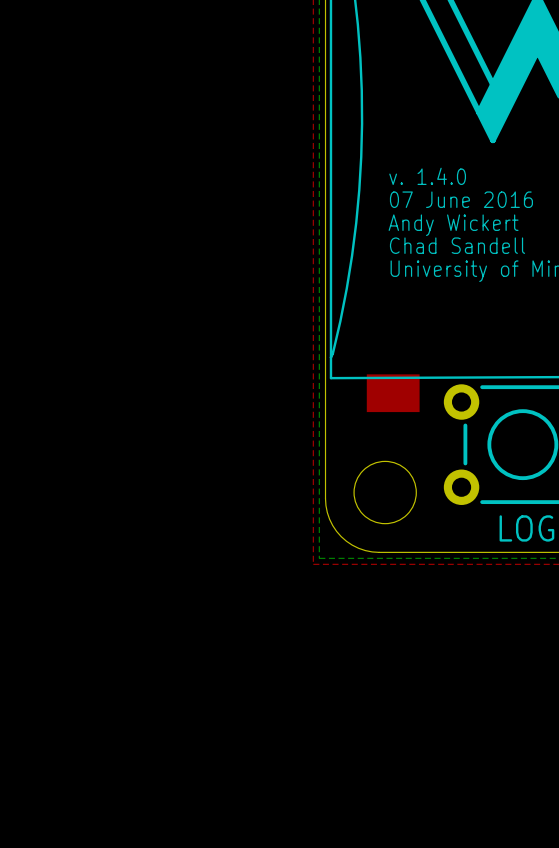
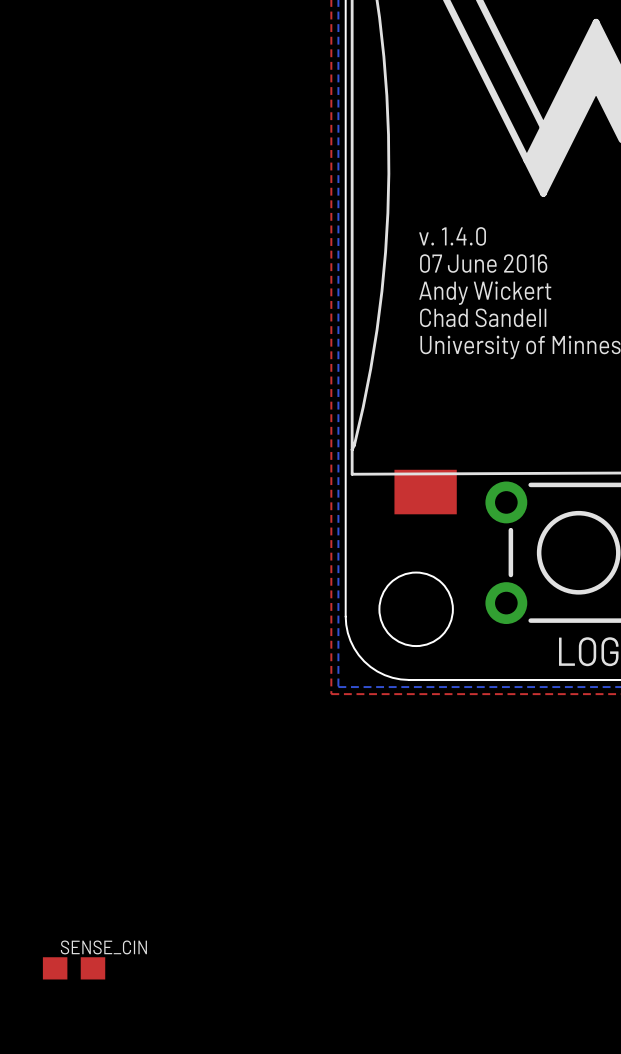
SENSE_CIN: none -> (74, 968)

